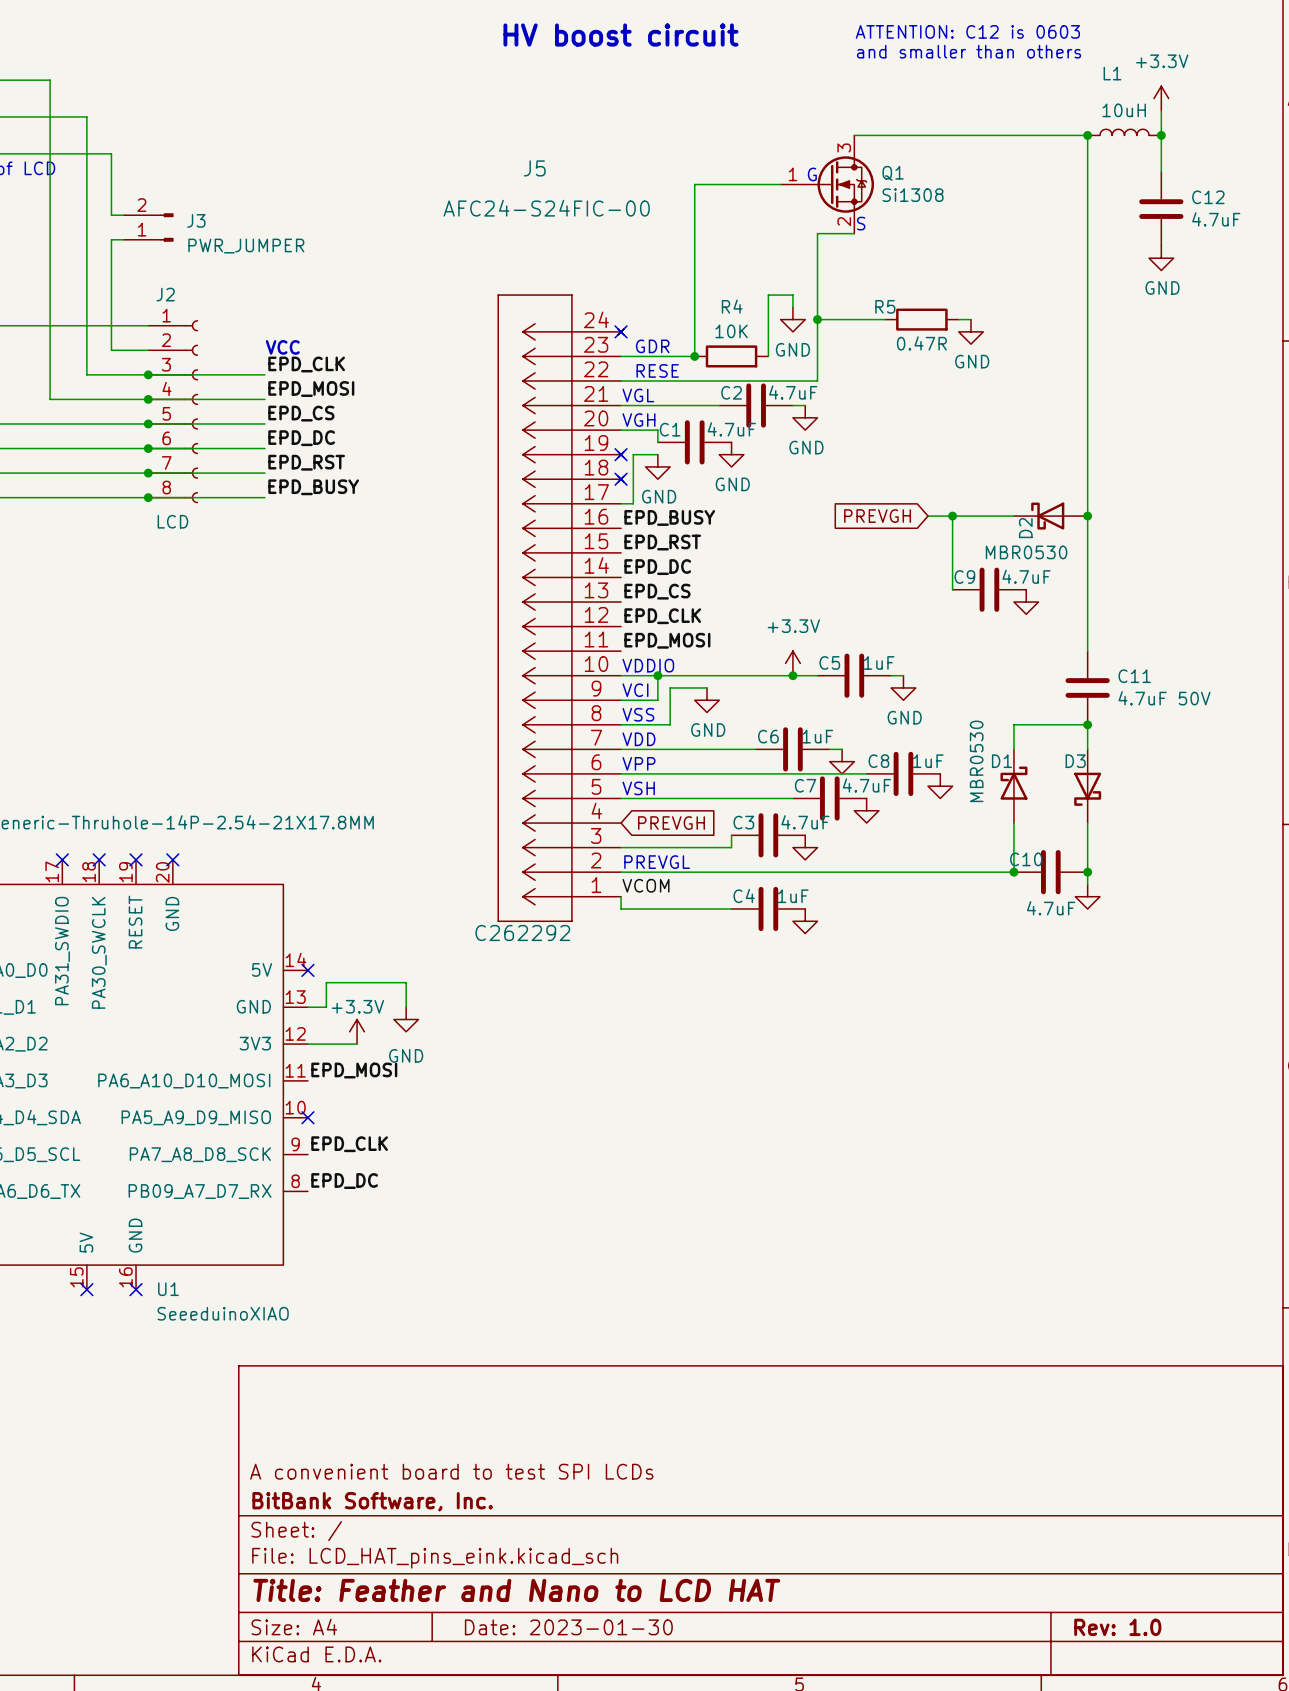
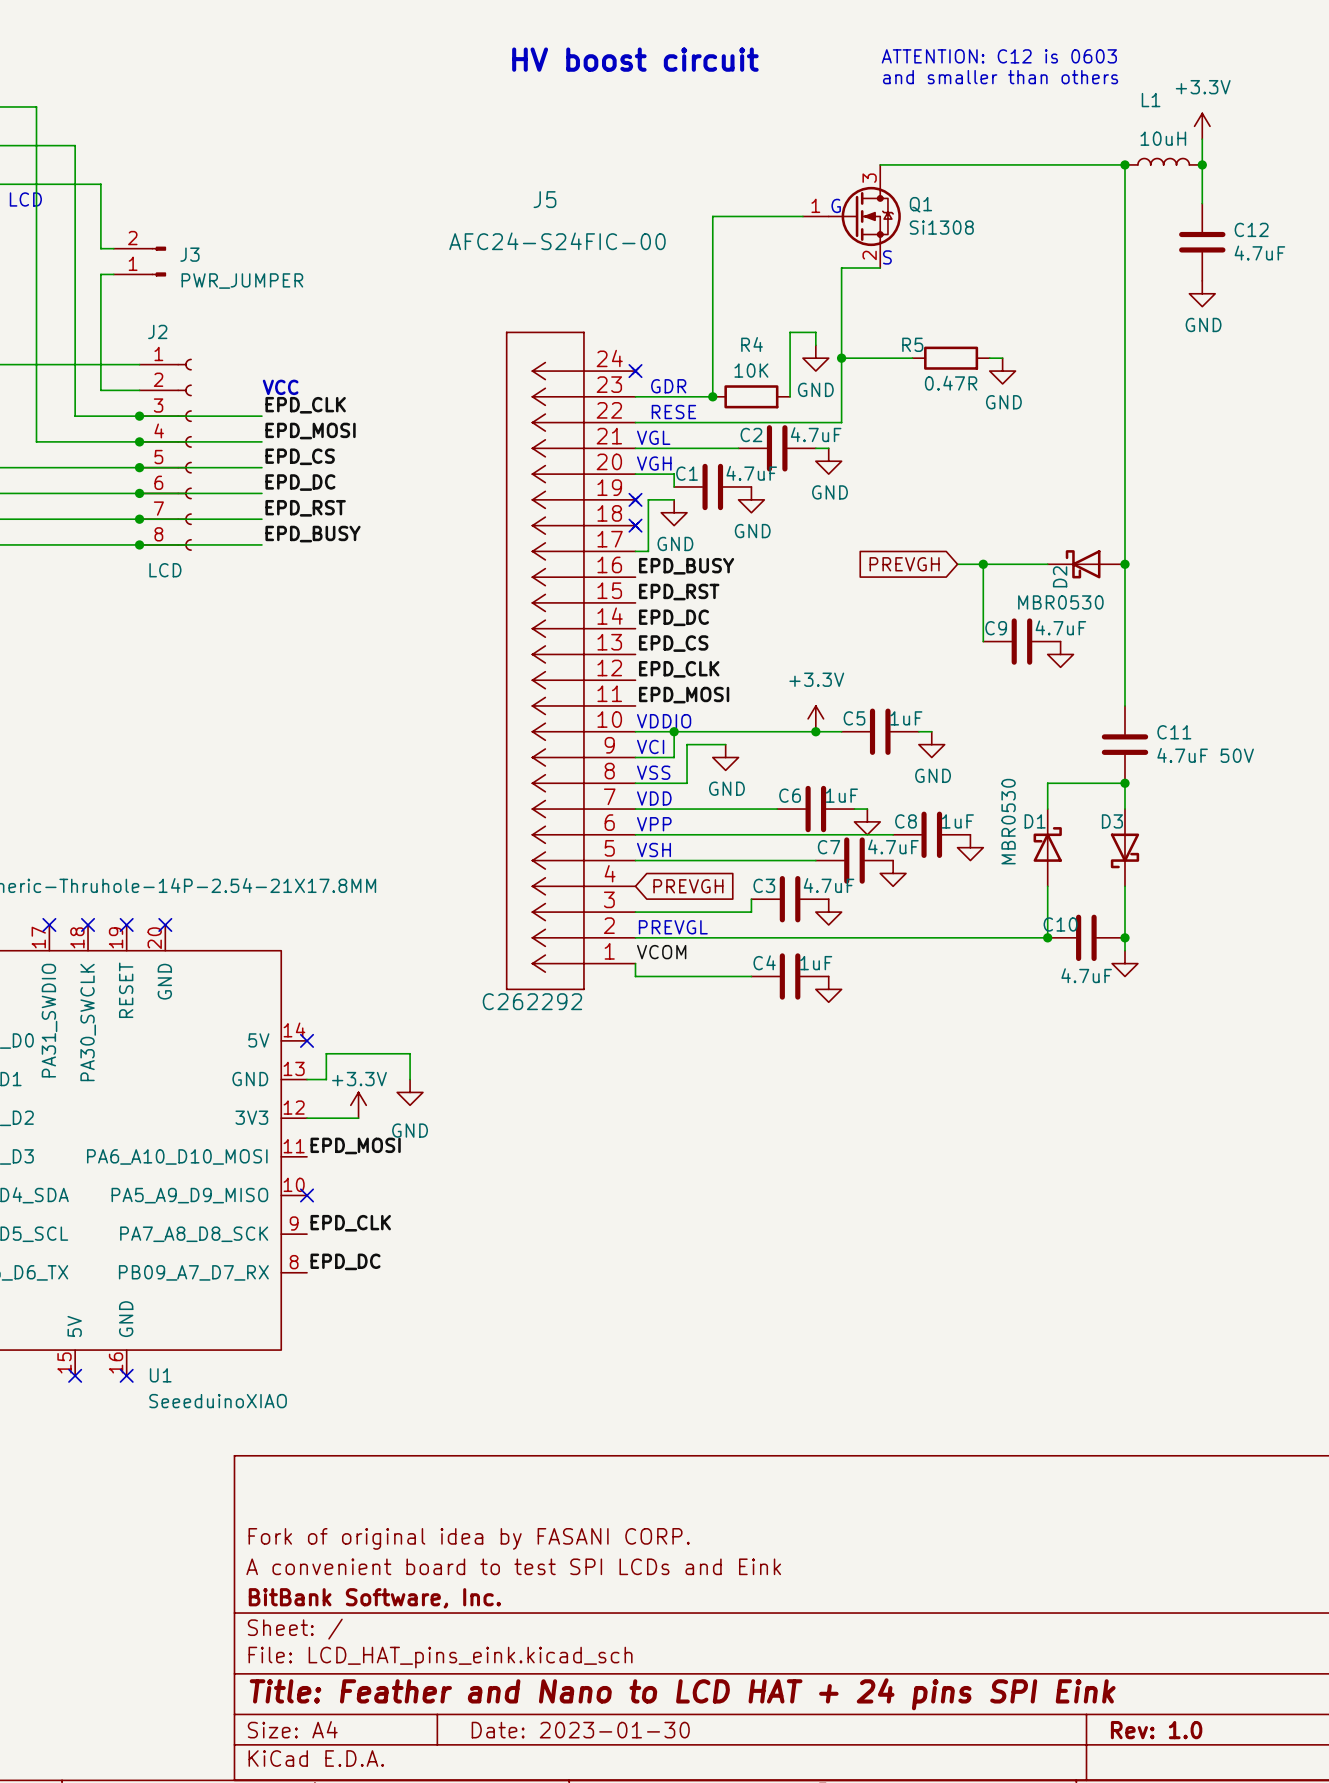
title block: none -> Fork of original idea by FASANI CORP. (469, 1538)
title block: A convenient board to test SPI LCDs (451, 1471) -> A convenient board to test SPI LCDs and Eink (513, 1566)
title block: Title: Feather and Nano to LCD HAT (516, 1590) -> Title: Feather and Nano to LCD HAT + 24 pins SPI Eink (682, 1694)

